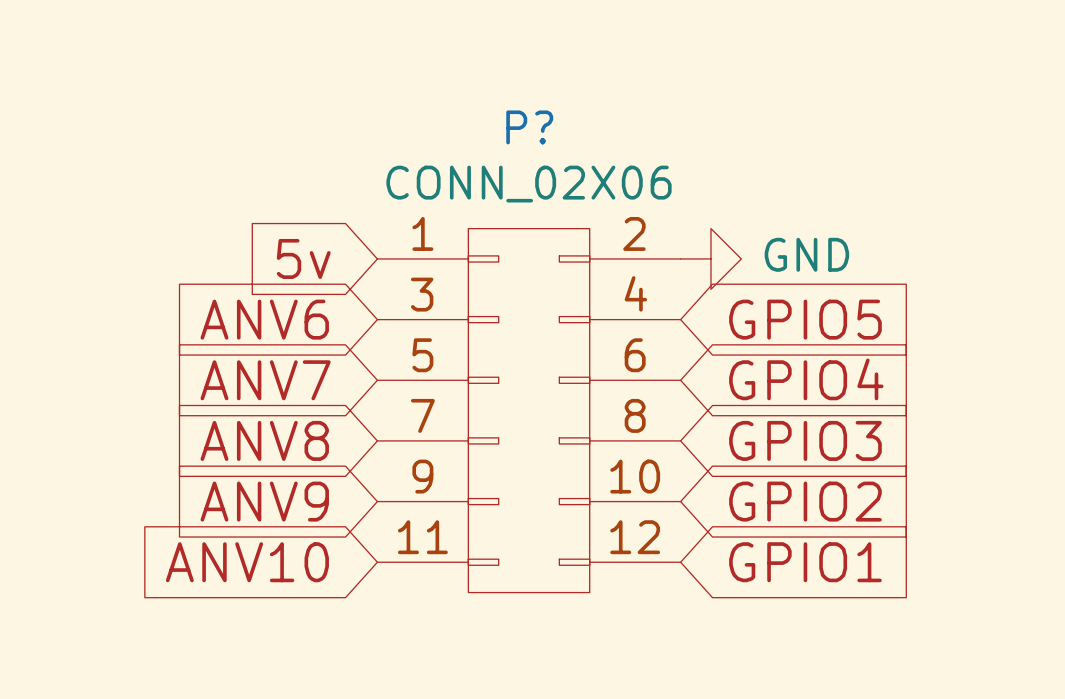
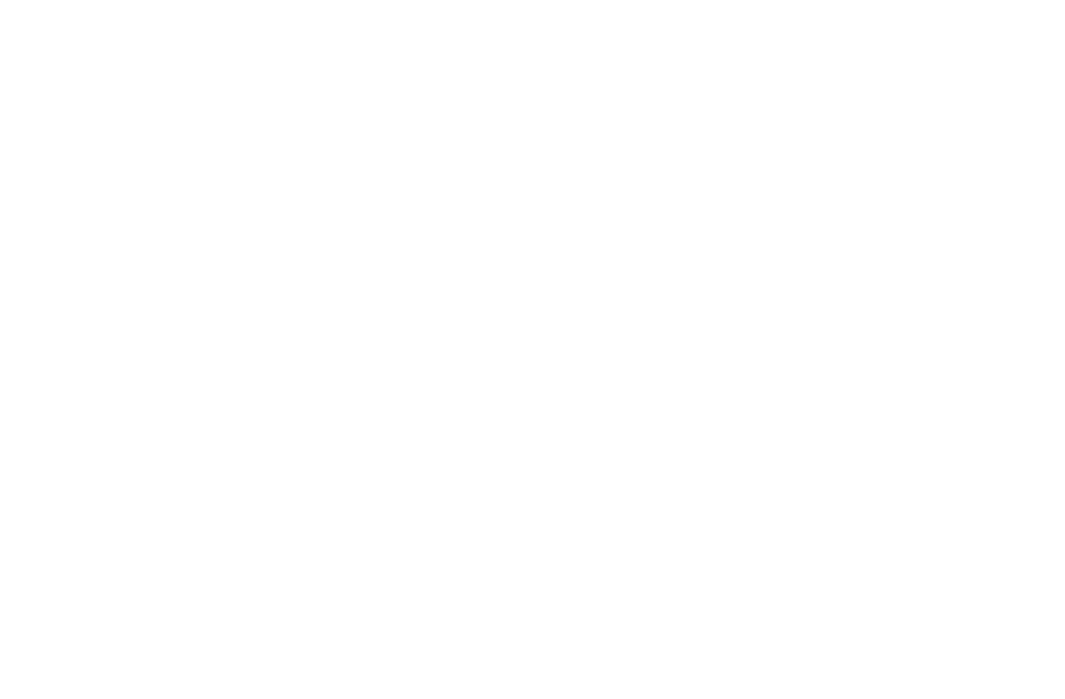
global label: 5v (303, 258) -> none
power symbol: GND (710, 258) -> none
global label: ANV6 (264, 319) -> none
global label: GPIO5 (805, 319) -> none
global label: GPIO4 (806, 379) -> none
global label: ANV7 (265, 380) -> none
P?: CONN_02X06 (529, 410) -> none
global label: ANV8 (264, 440) -> none
global label: GPIO3 (805, 440) -> none
global label: ANV9 (264, 501) -> none
global label: GPIO2 (805, 501) -> none
global label: ANV10 (247, 562) -> none
global label: GPIO1 (805, 562) -> none

